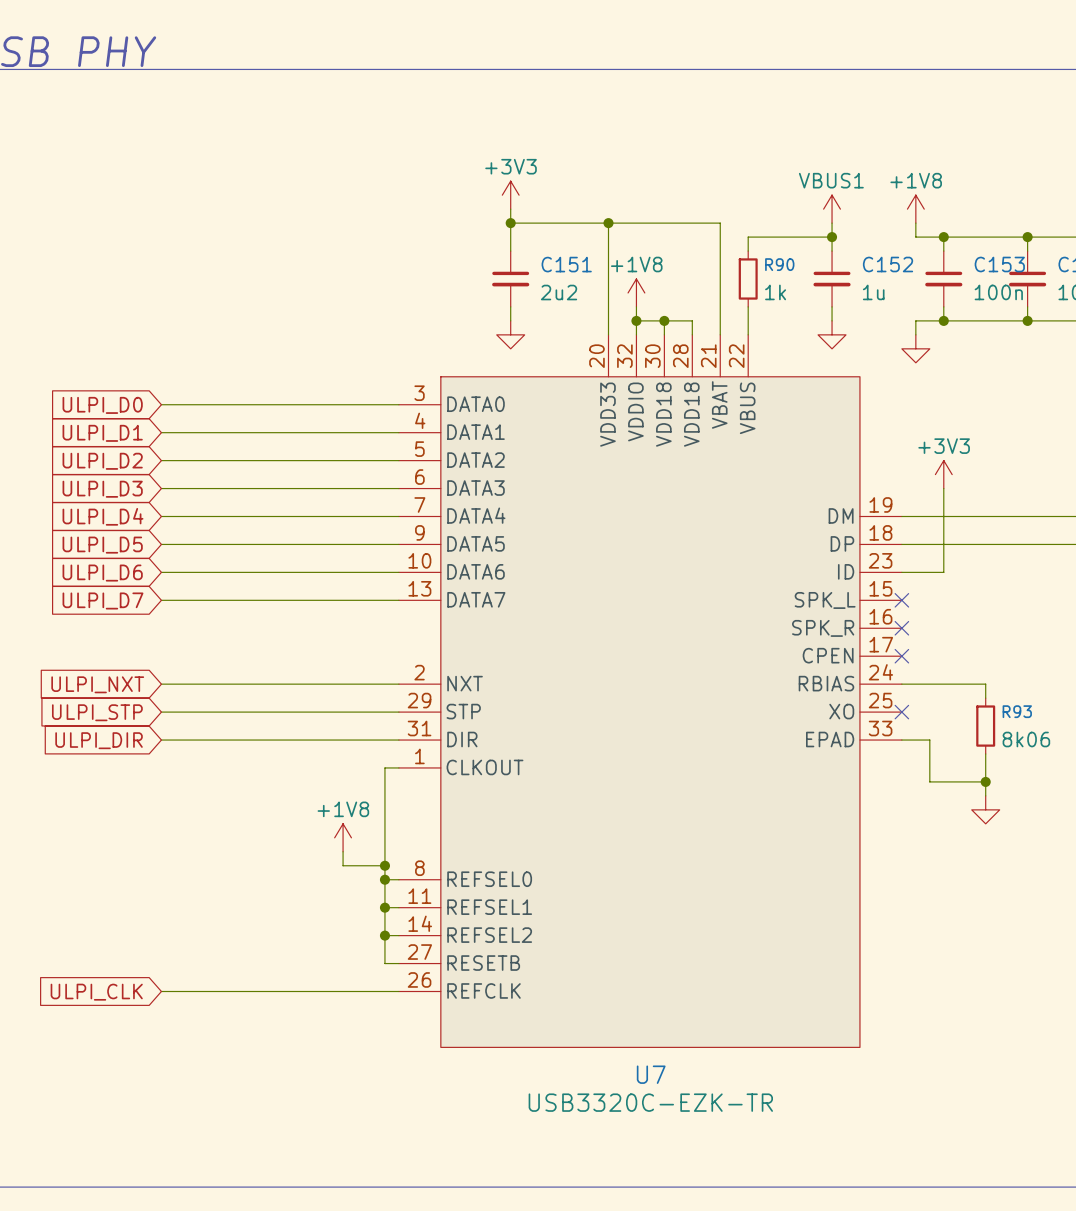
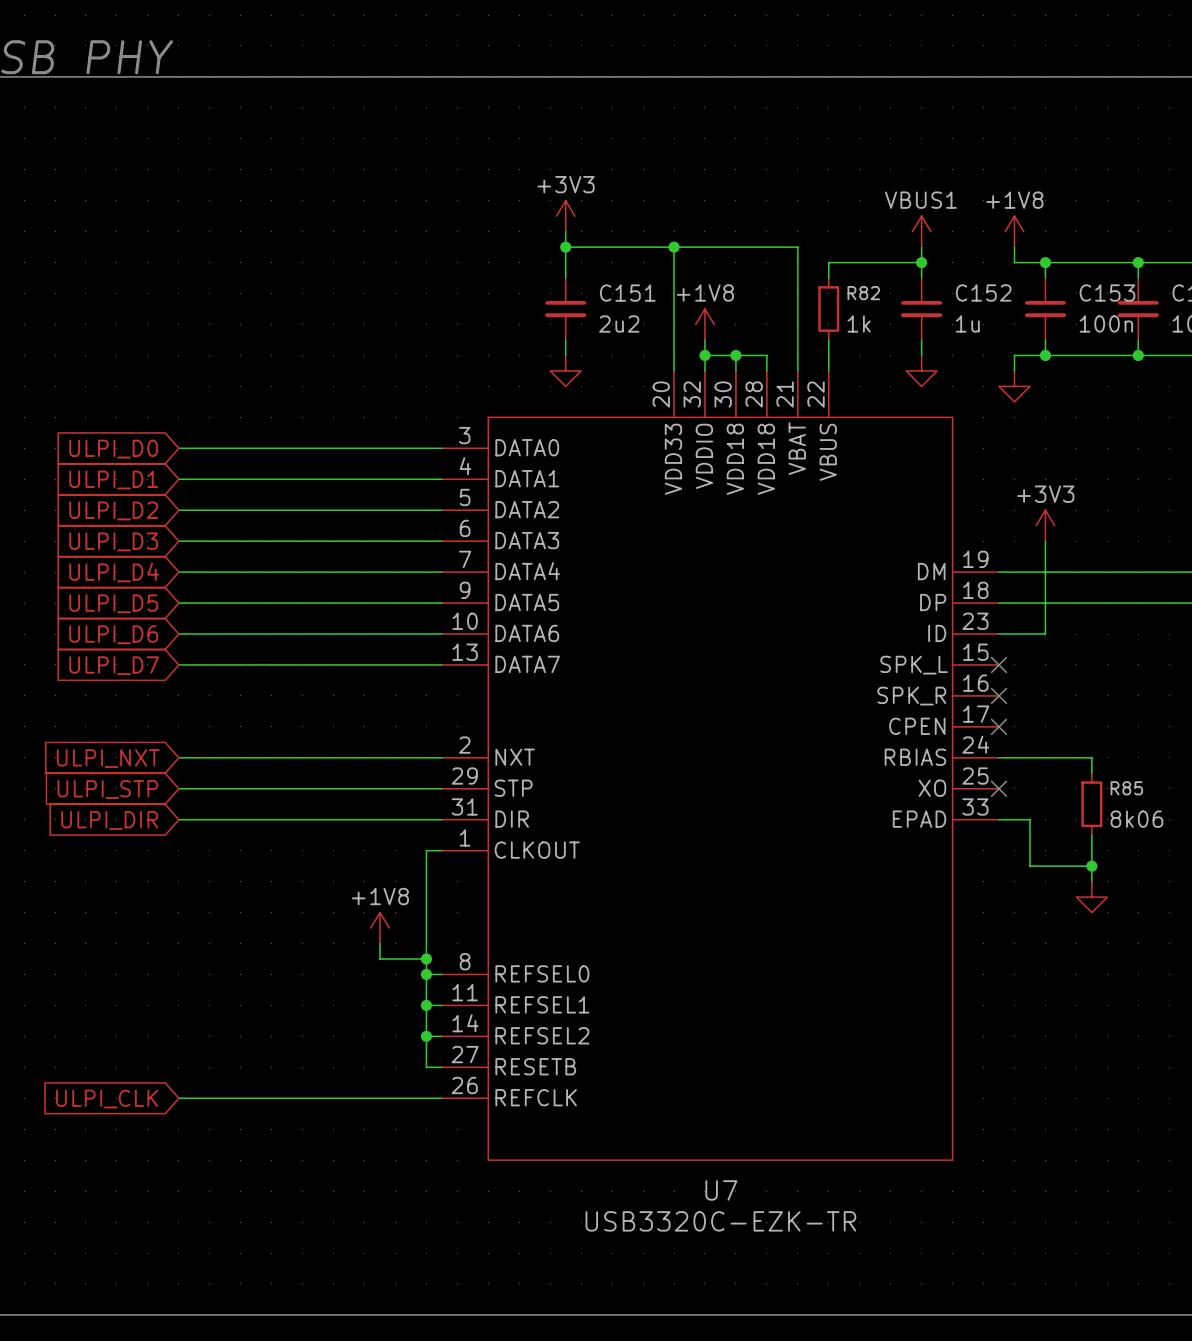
R90 name: R90 (779, 264) -> R82 (863, 293)
R93 name: R93 (1017, 711) -> R85 (1126, 788)

